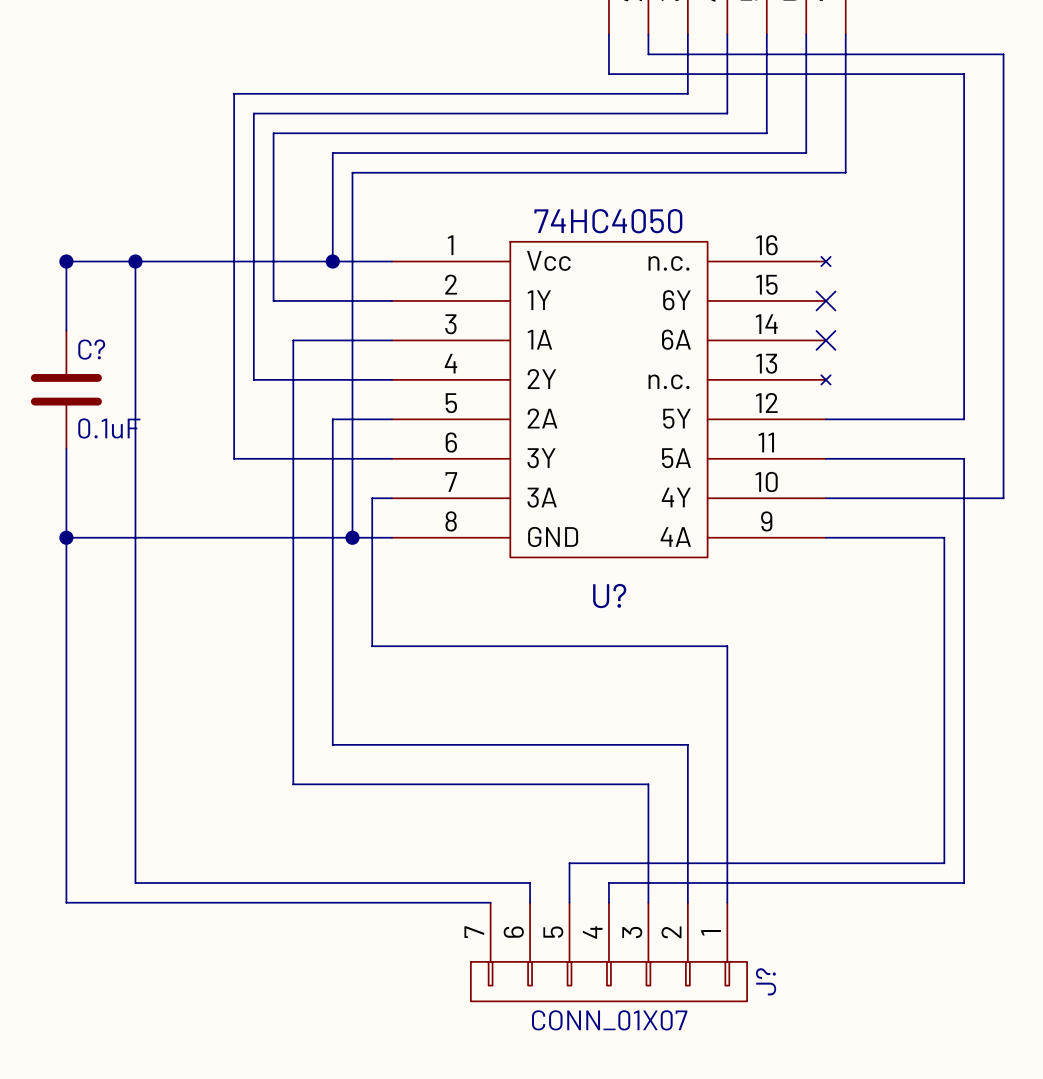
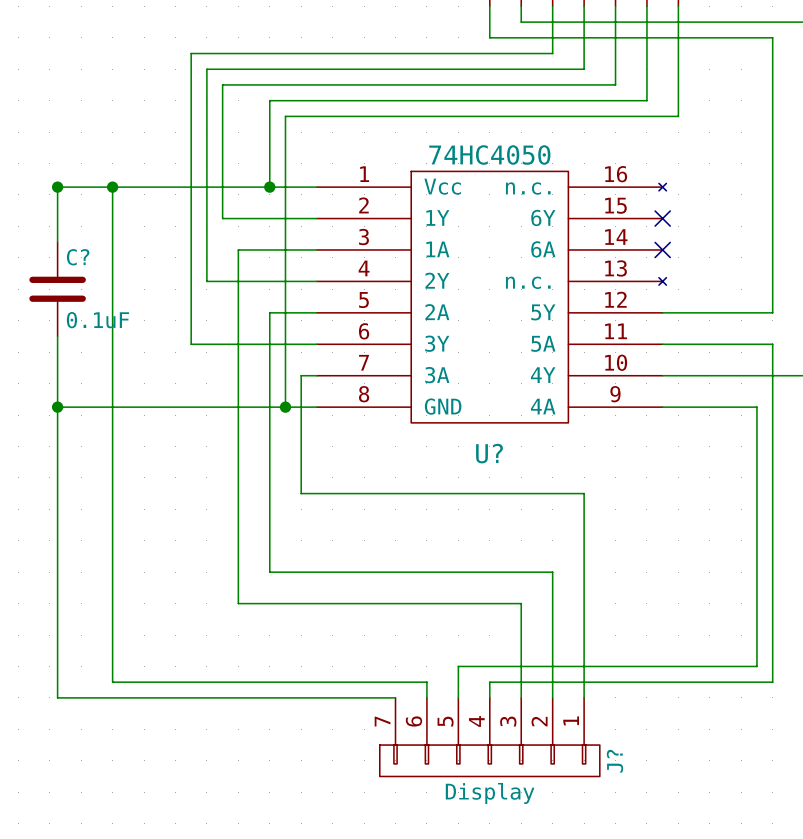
J? value: CONN_01X07 (609, 1020) -> Display (490, 793)

